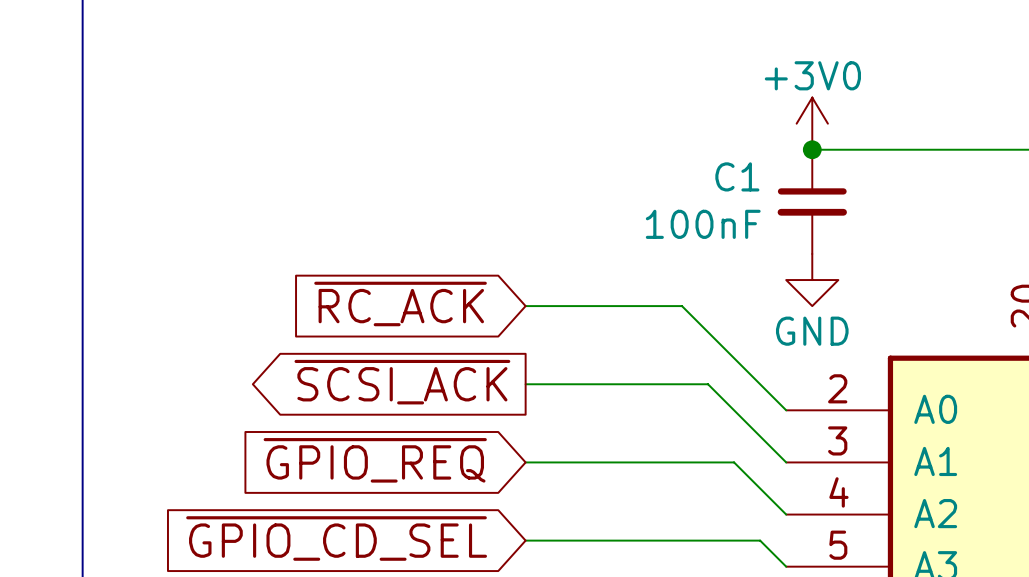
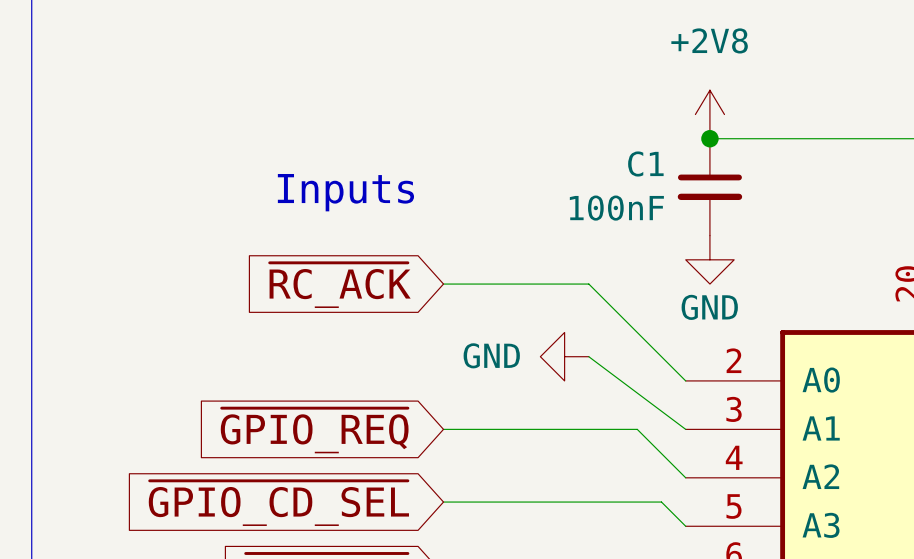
power symbol: +3V0 (812, 123) -> +2V8 (709, 114)
text: none -> Inputs (345, 192)
global label: ~{SCSI_ACK} (402, 382) -> none
wire: (525, 384) (708, 384) (786, 462) -> (588, 356) (685, 429)
power symbol: none -> GND (564, 356)

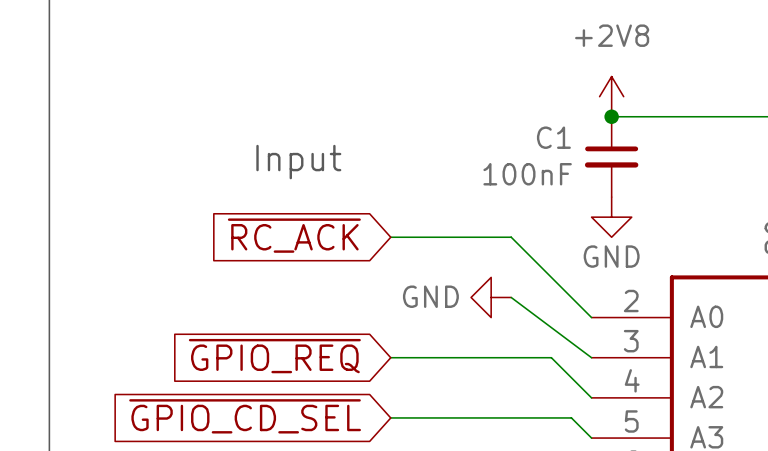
text: Inputs (345, 192) -> Input (298, 162)

